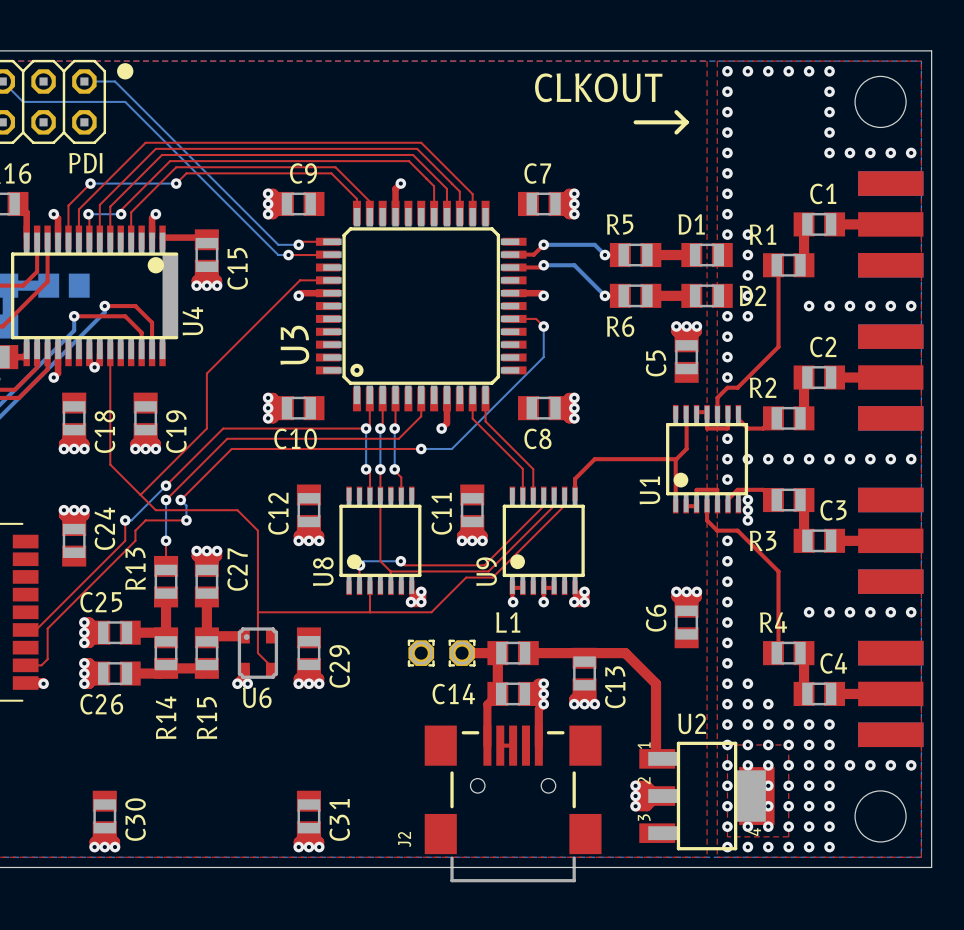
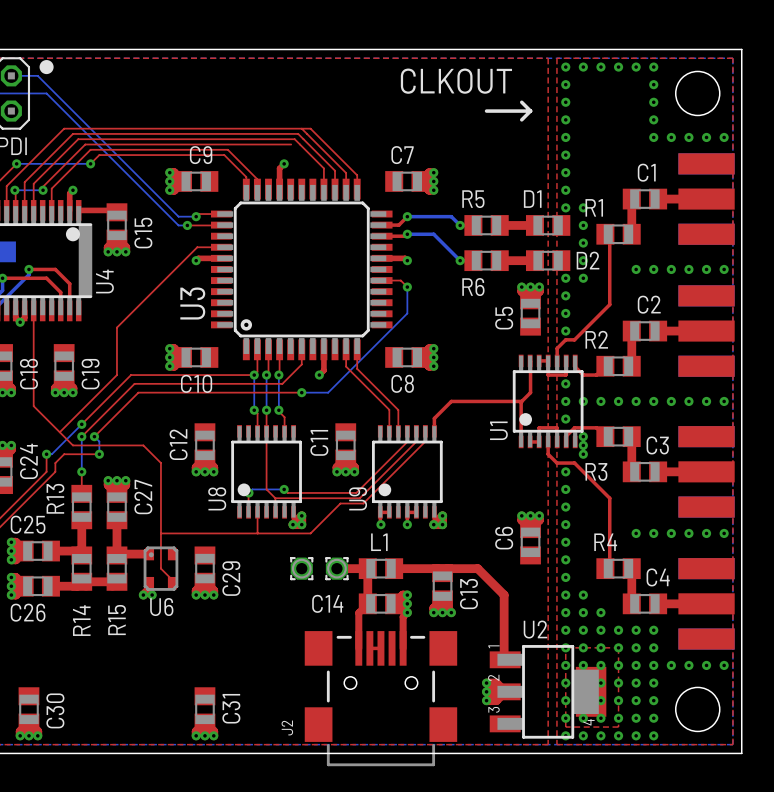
top track: none -> (301, 128) (310, 128) (357, 175) (357, 189)
top track: (408, 161) (434, 186) (434, 212) -> none

